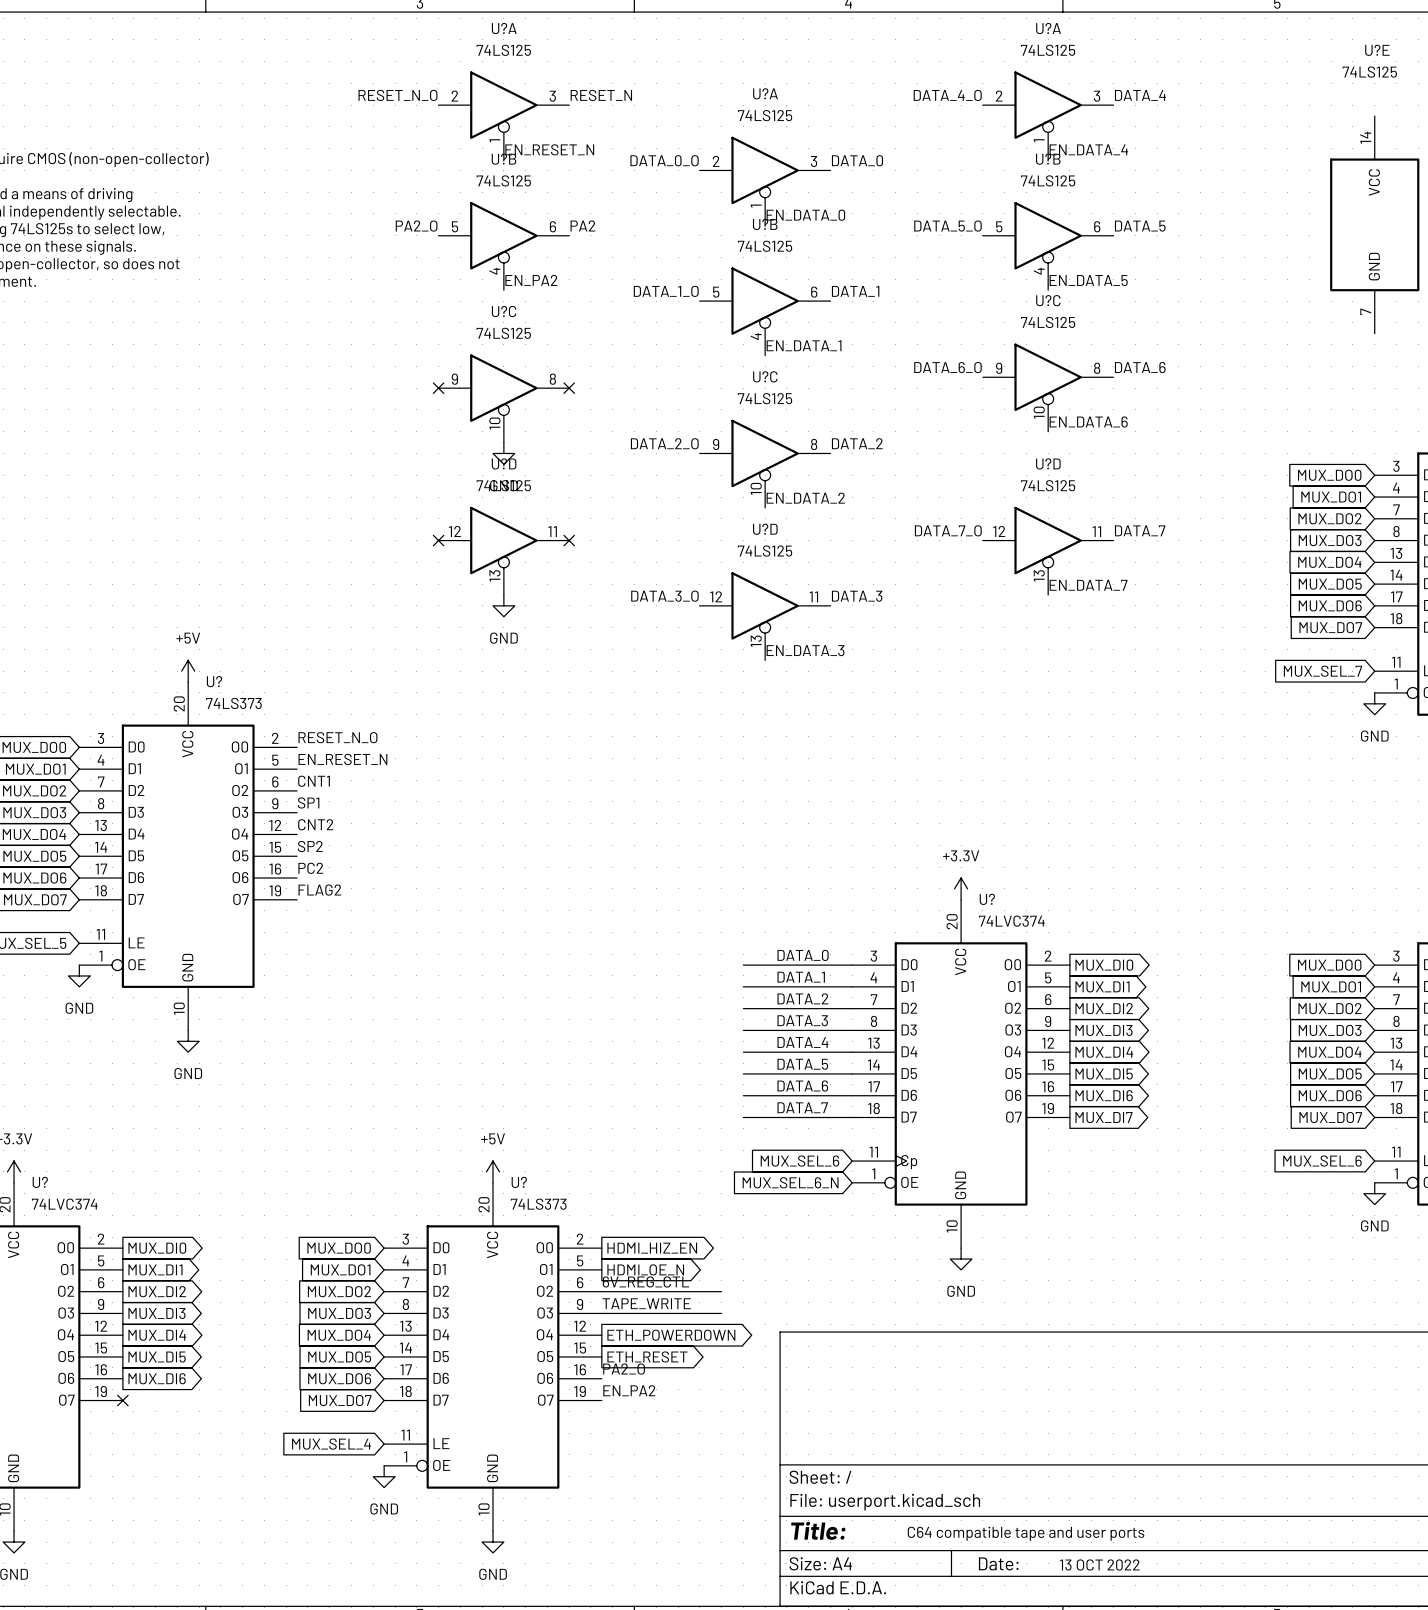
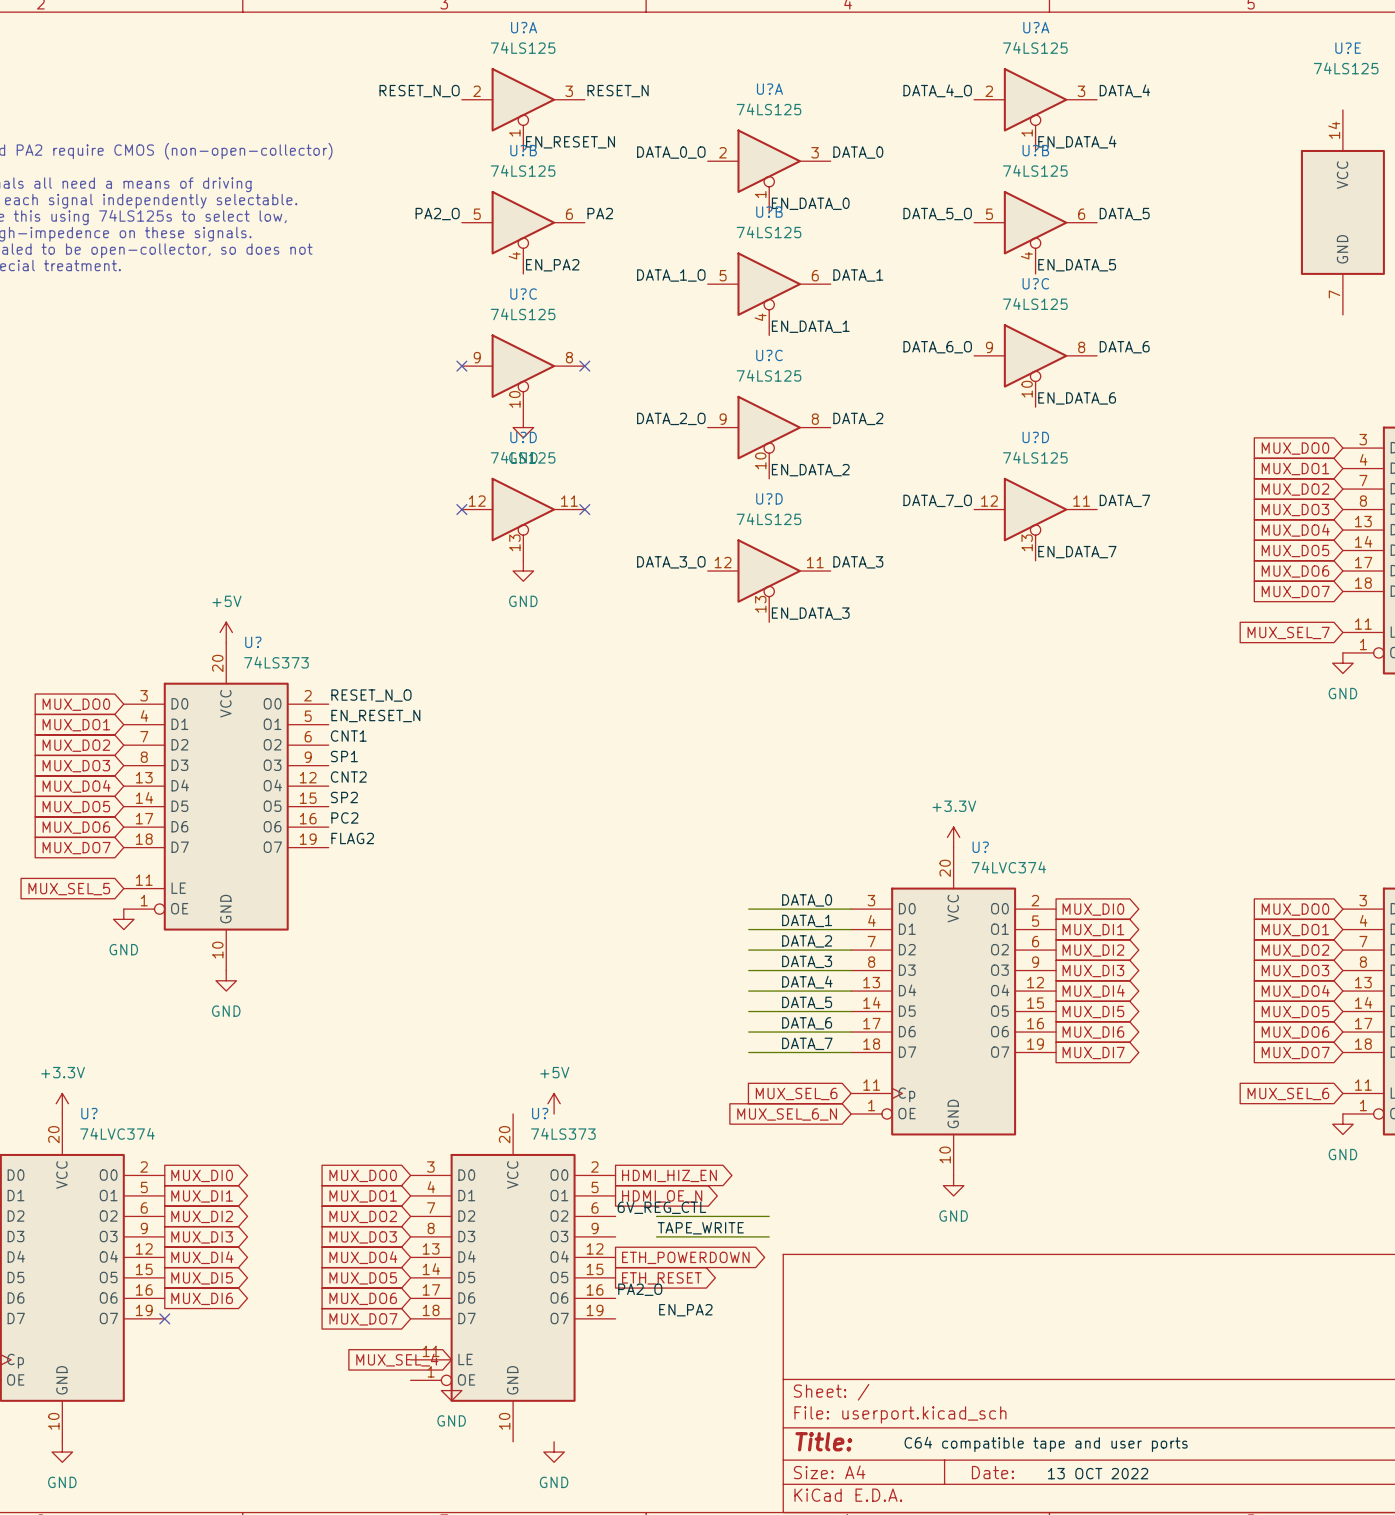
power symbol position: +5V (493, 1171) -> +5V (554, 1103)
wire: (601, 1291) (645, 1291) -> (728, 1216) (769, 1216)
label position: TAPE_WRITE (646, 1303) -> TAPE_WRITE (700, 1228)
wire: (601, 1313) (645, 1313) -> (728, 1236) (769, 1236)
label position: EN_PA2 (629, 1390) -> EN_PA2 (685, 1310)
global label position: MUX_SEL_4 (331, 1444) -> MUX_SEL_4 (397, 1360)
power symbol position: GND (384, 1476) -> GND (451, 1390)
power symbol position: GND (493, 1542) -> GND (554, 1452)

